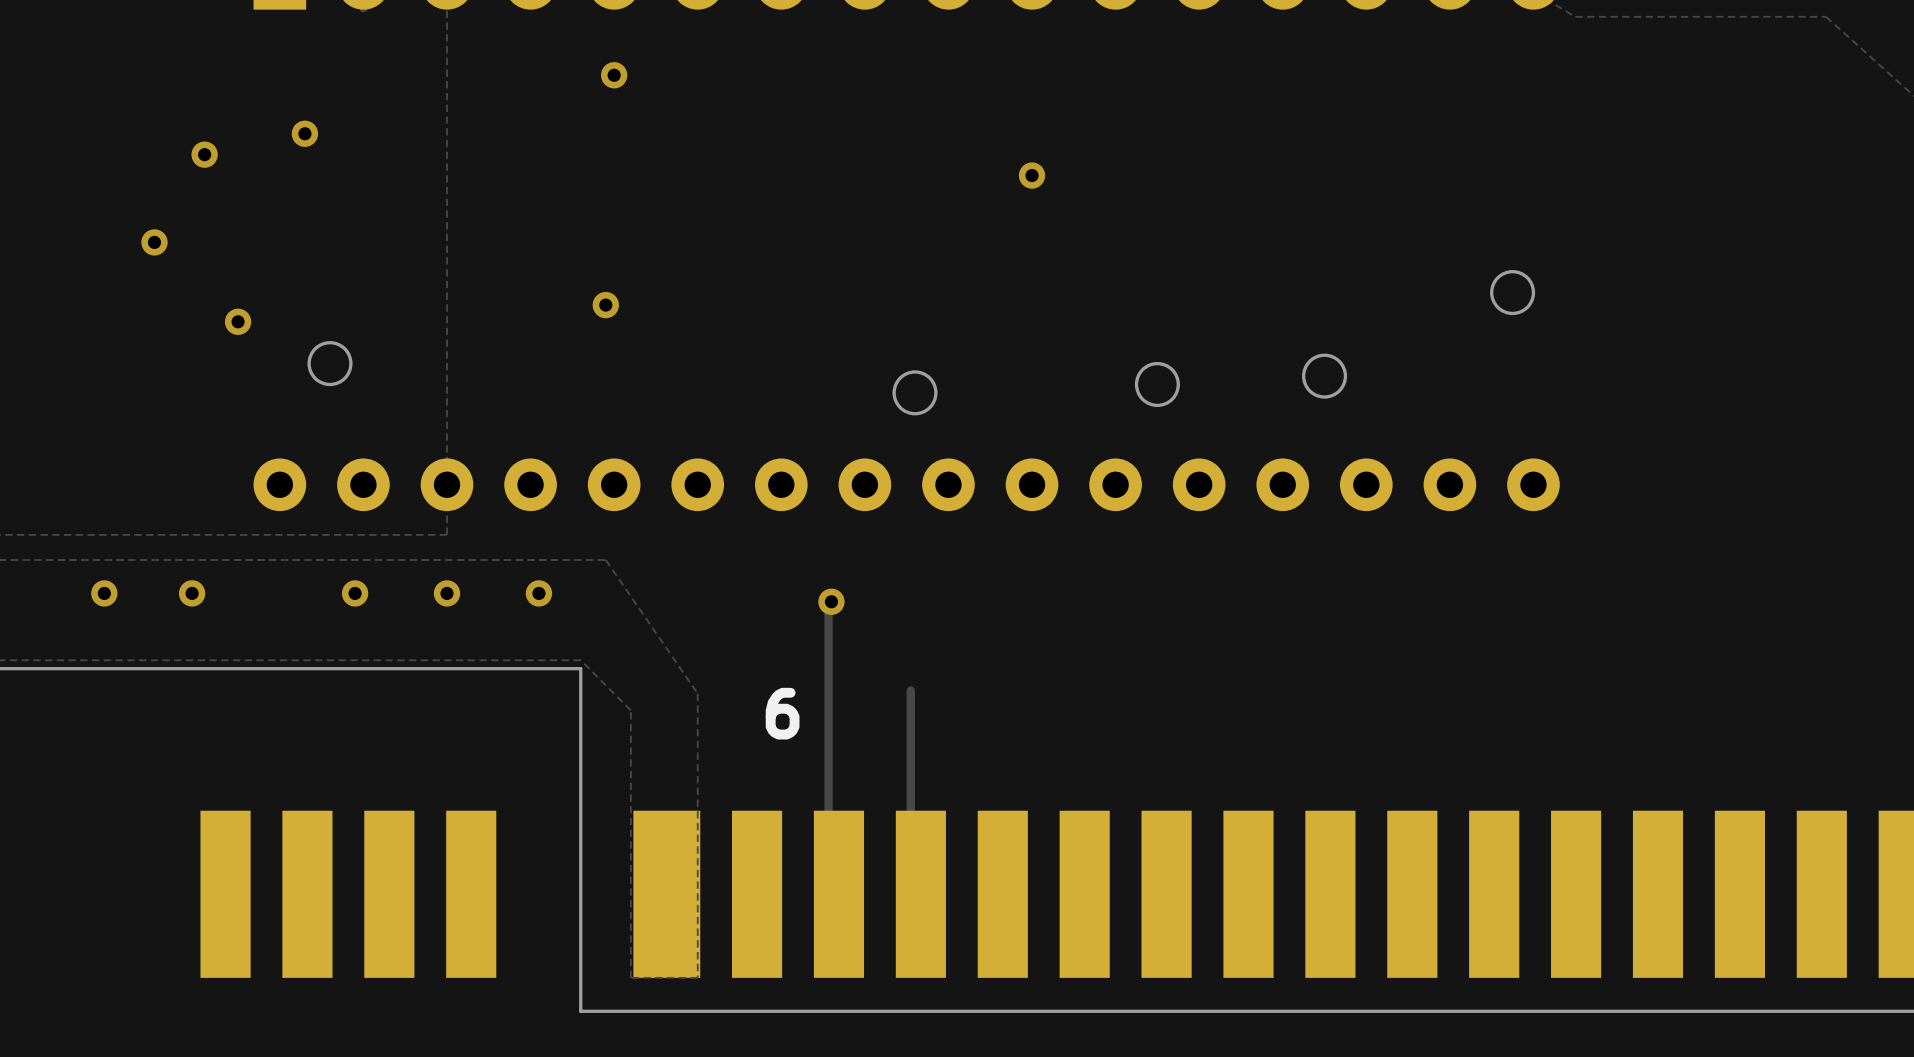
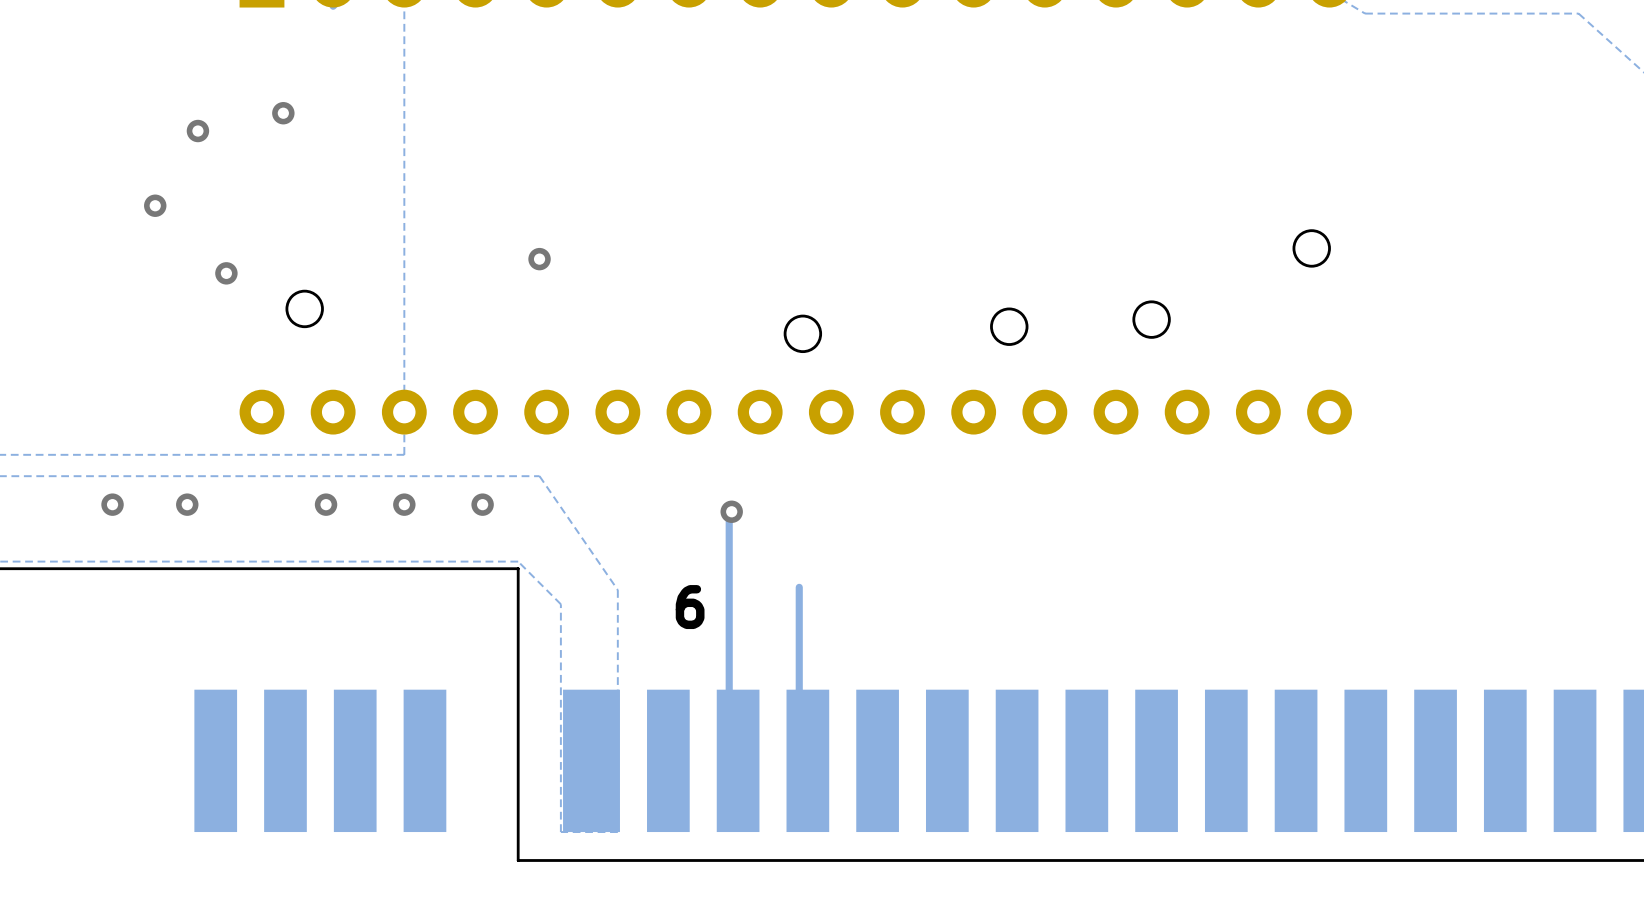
via: (614, 75) -> none
via: (1032, 175) -> none

